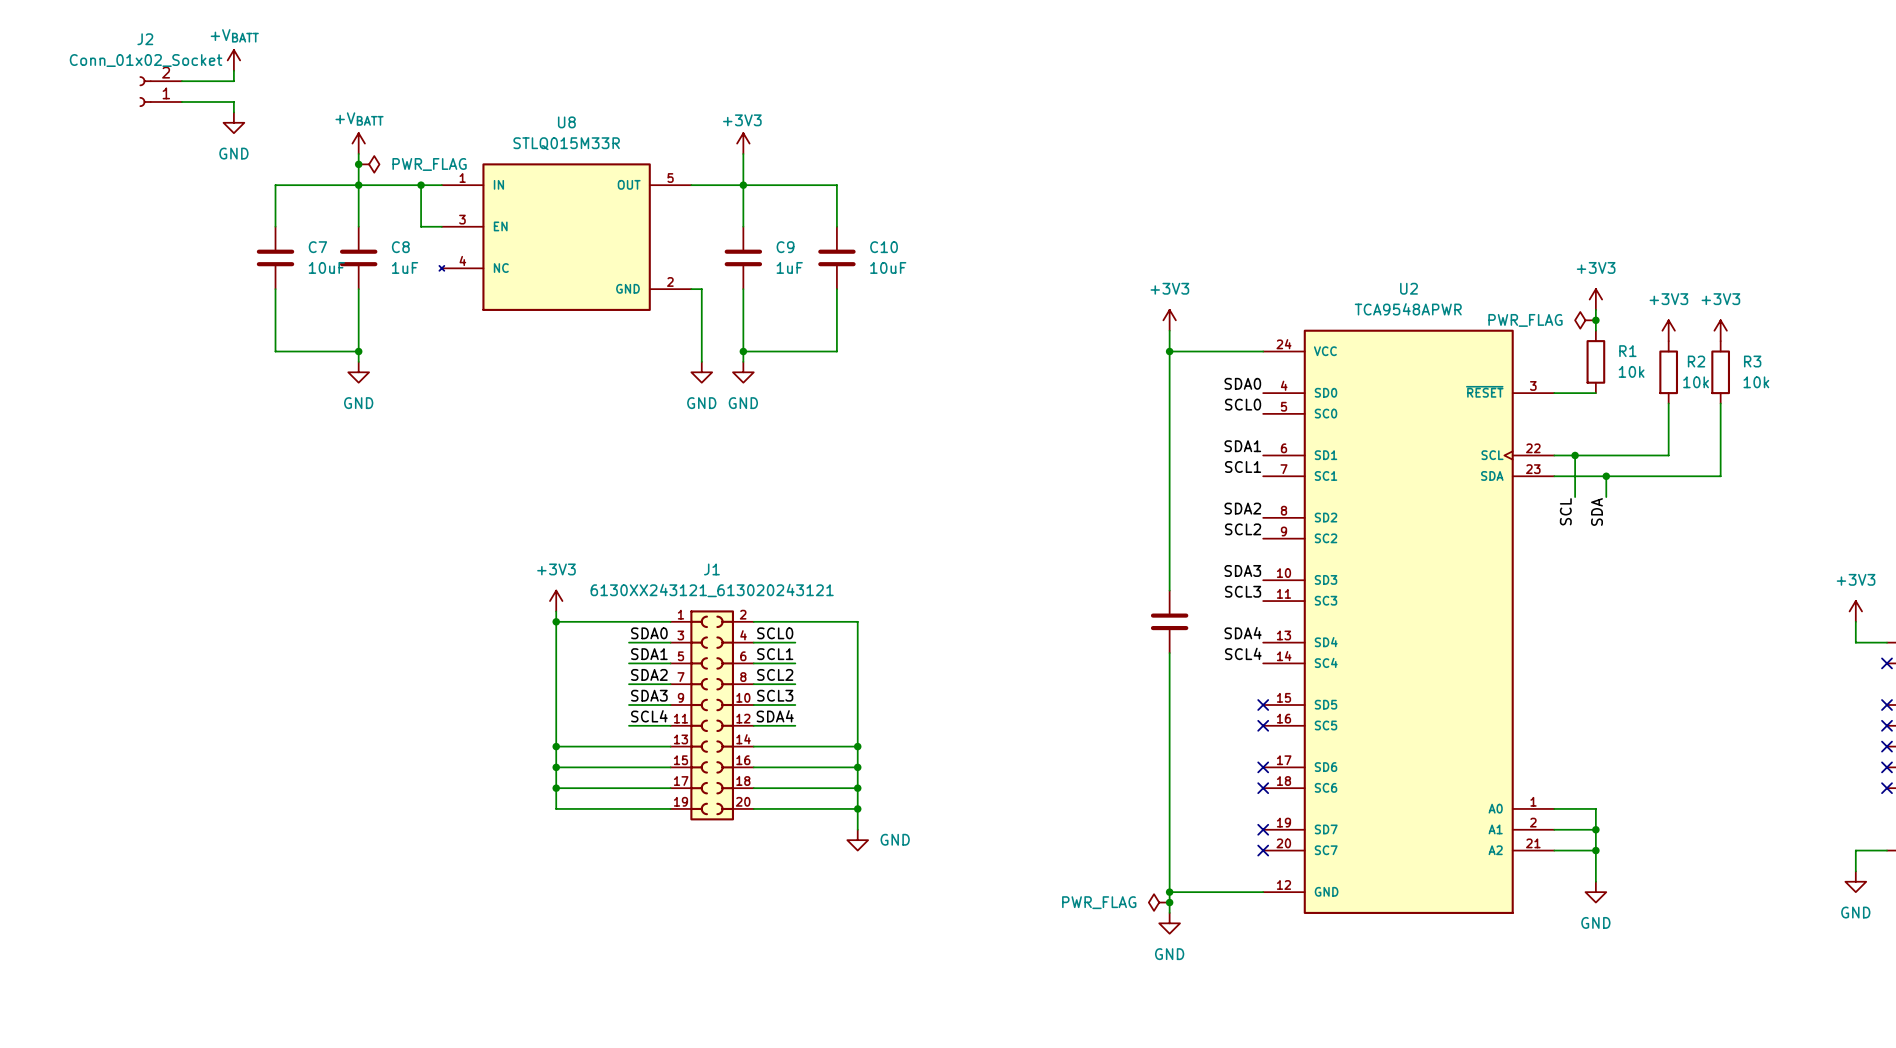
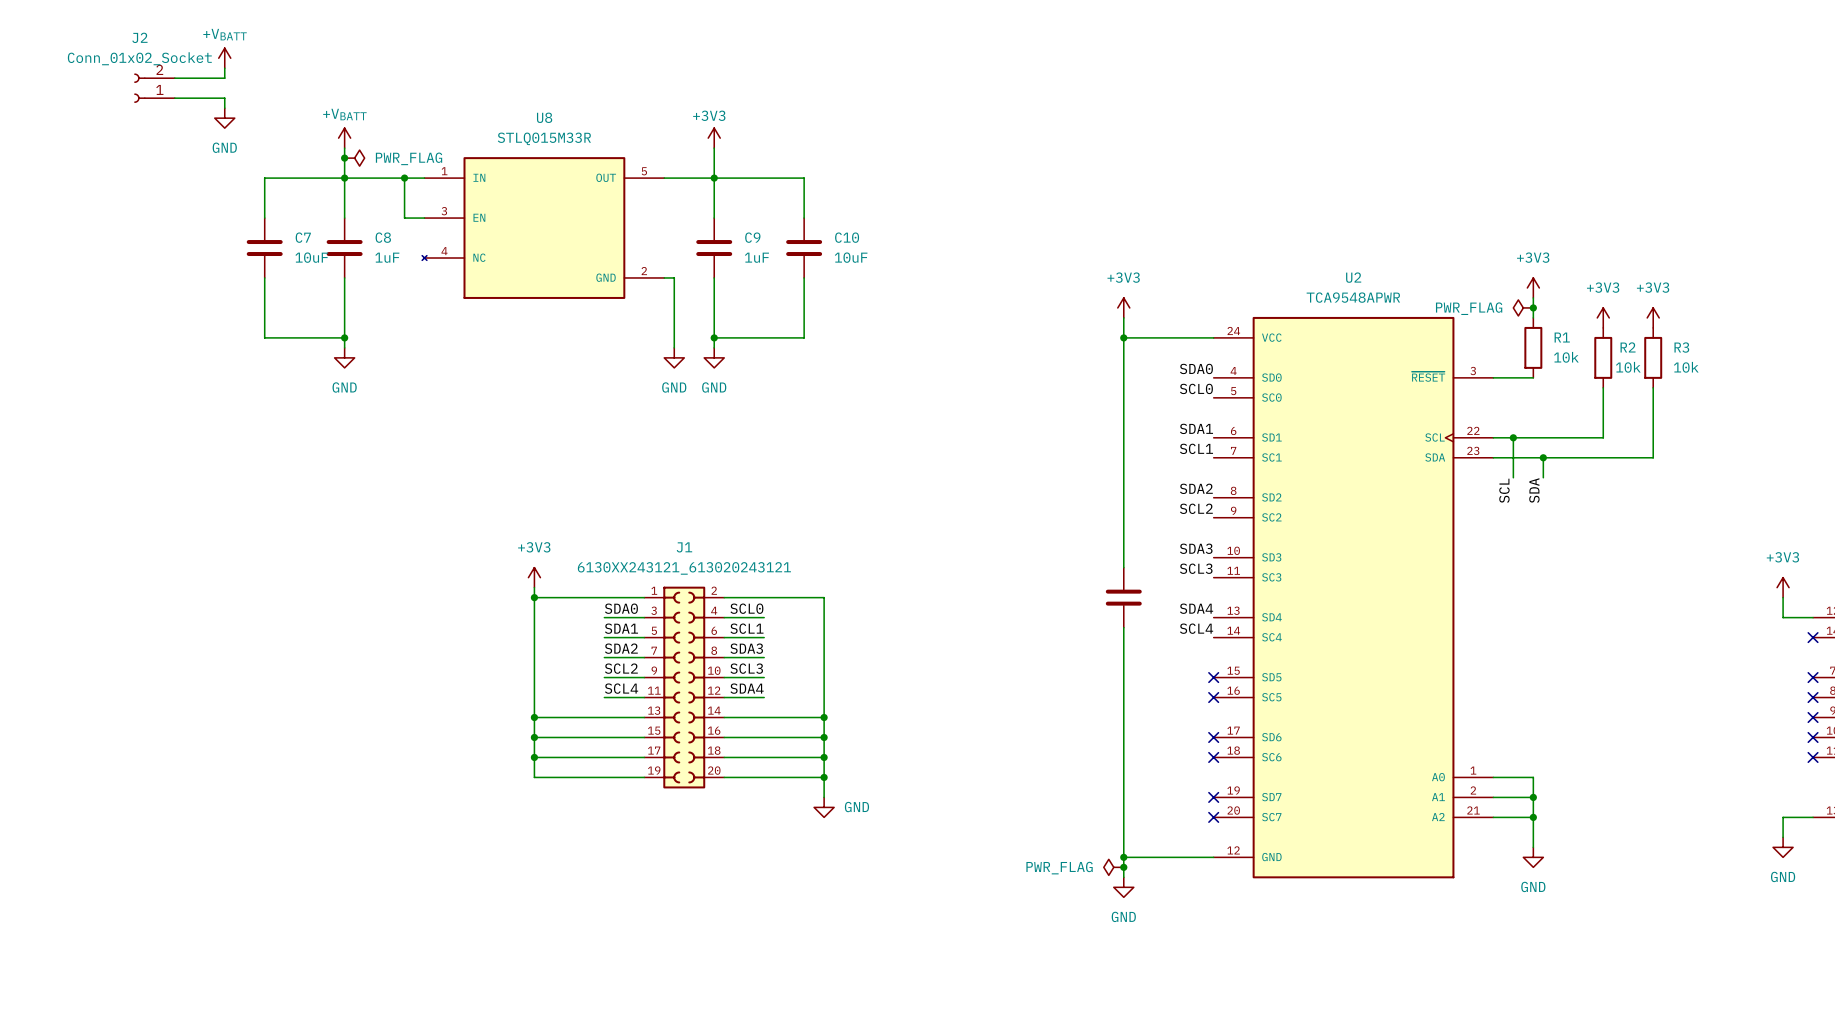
label: SCL2 (775, 674) -> SDA3 (746, 648)
label: SDA3 (649, 695) -> SCL2 (621, 668)

